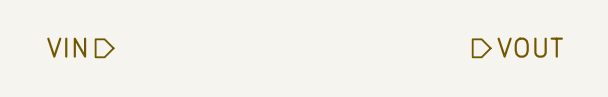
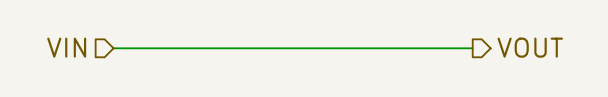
wire: none -> (113, 48) (472, 48)

